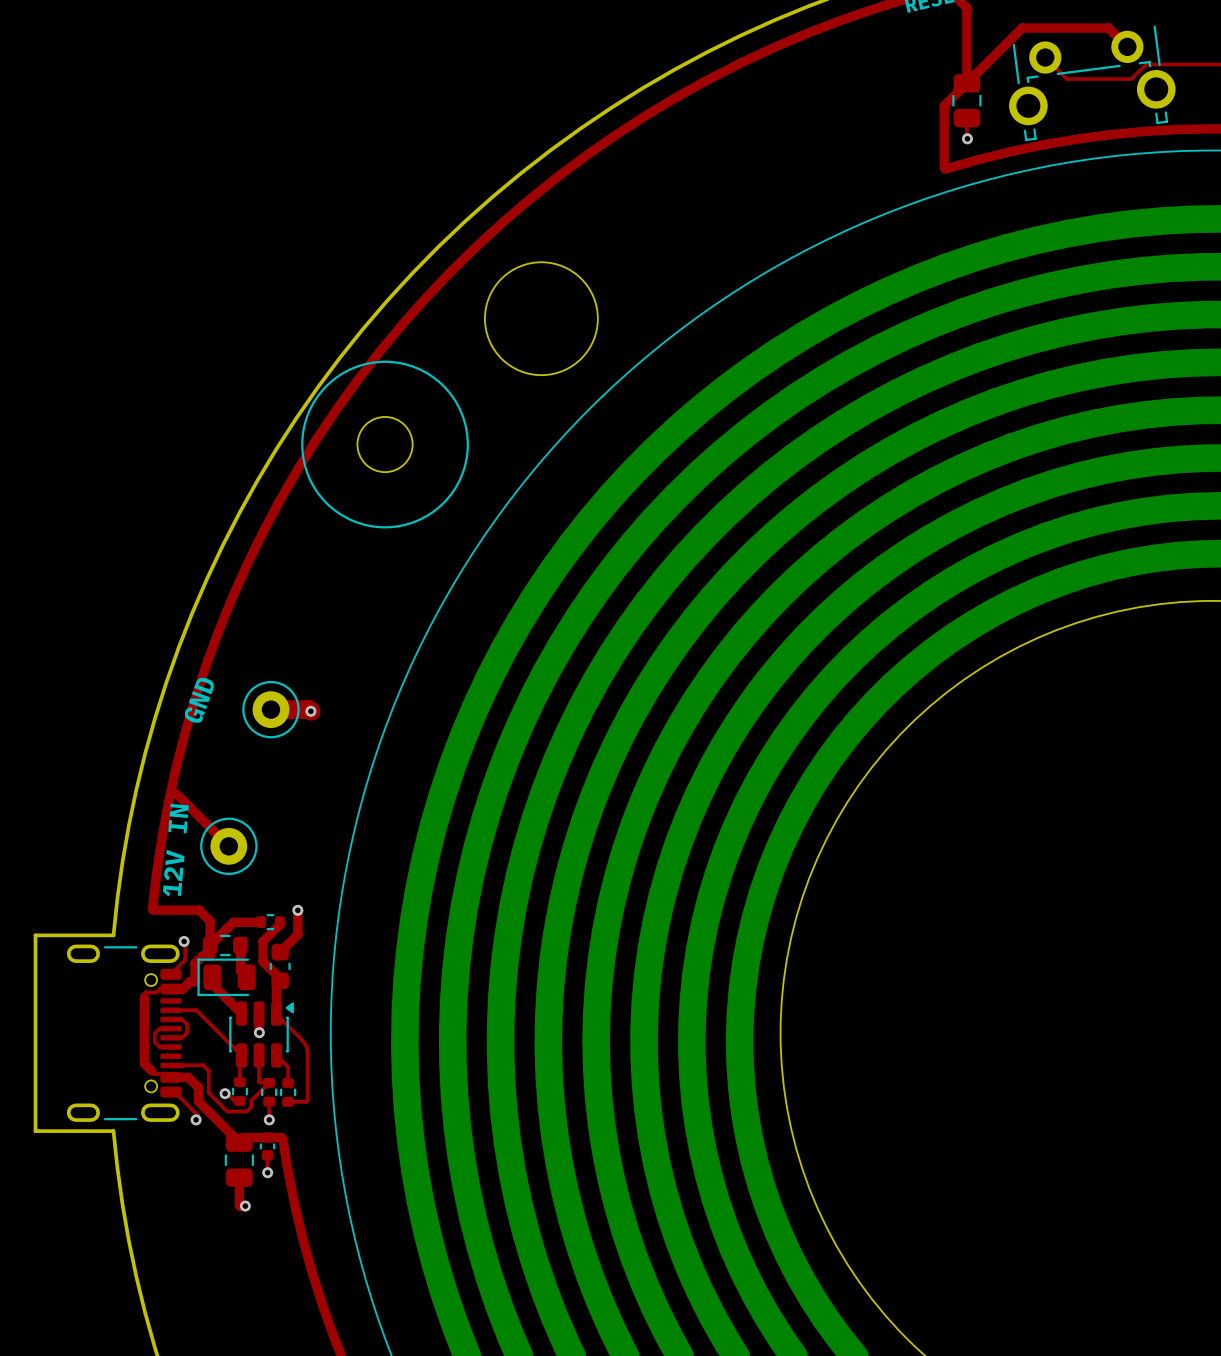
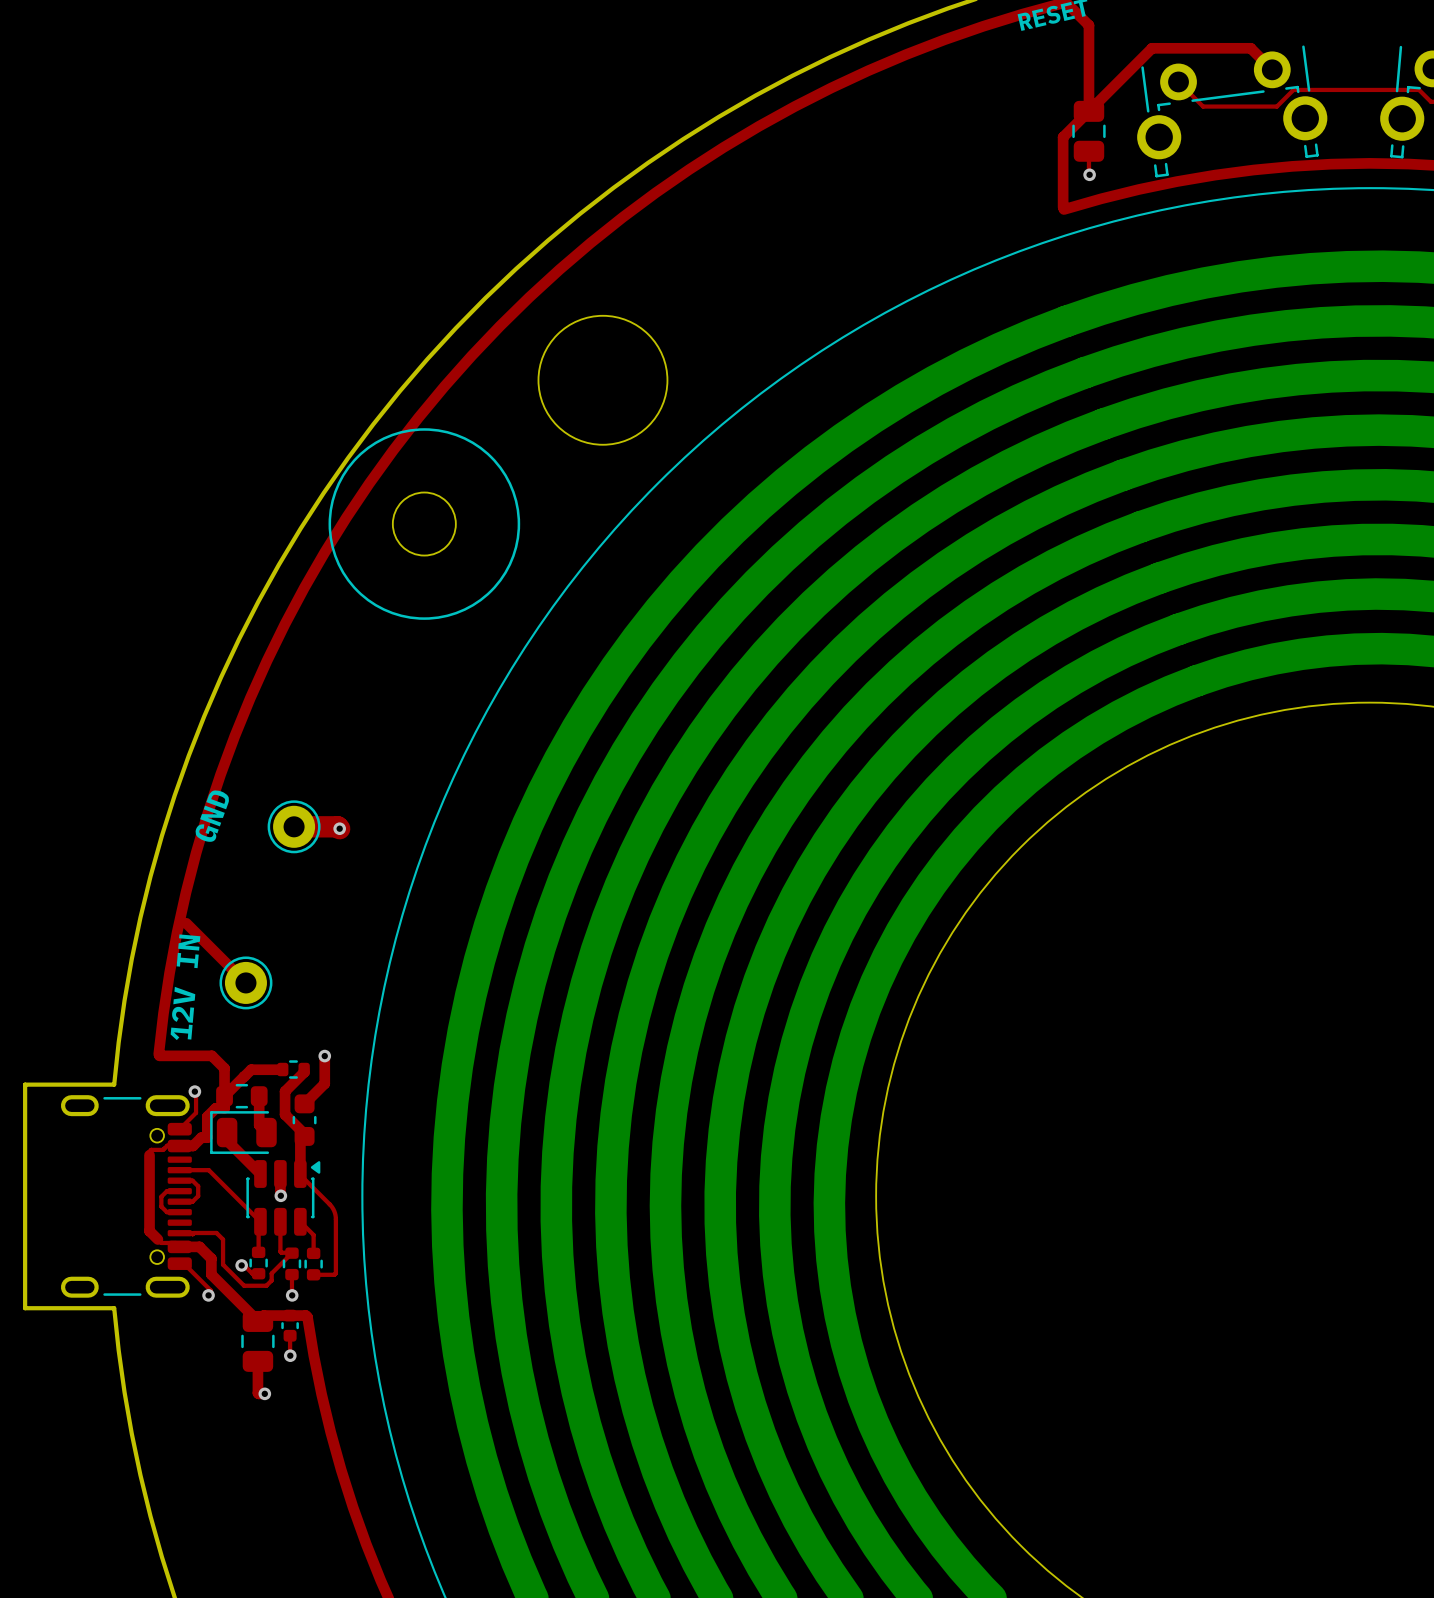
part footprint: [242, 680, 300, 739] -> [267, 800, 321, 854]
part footprint: [200, 817, 258, 876] -> [219, 956, 273, 1010]

